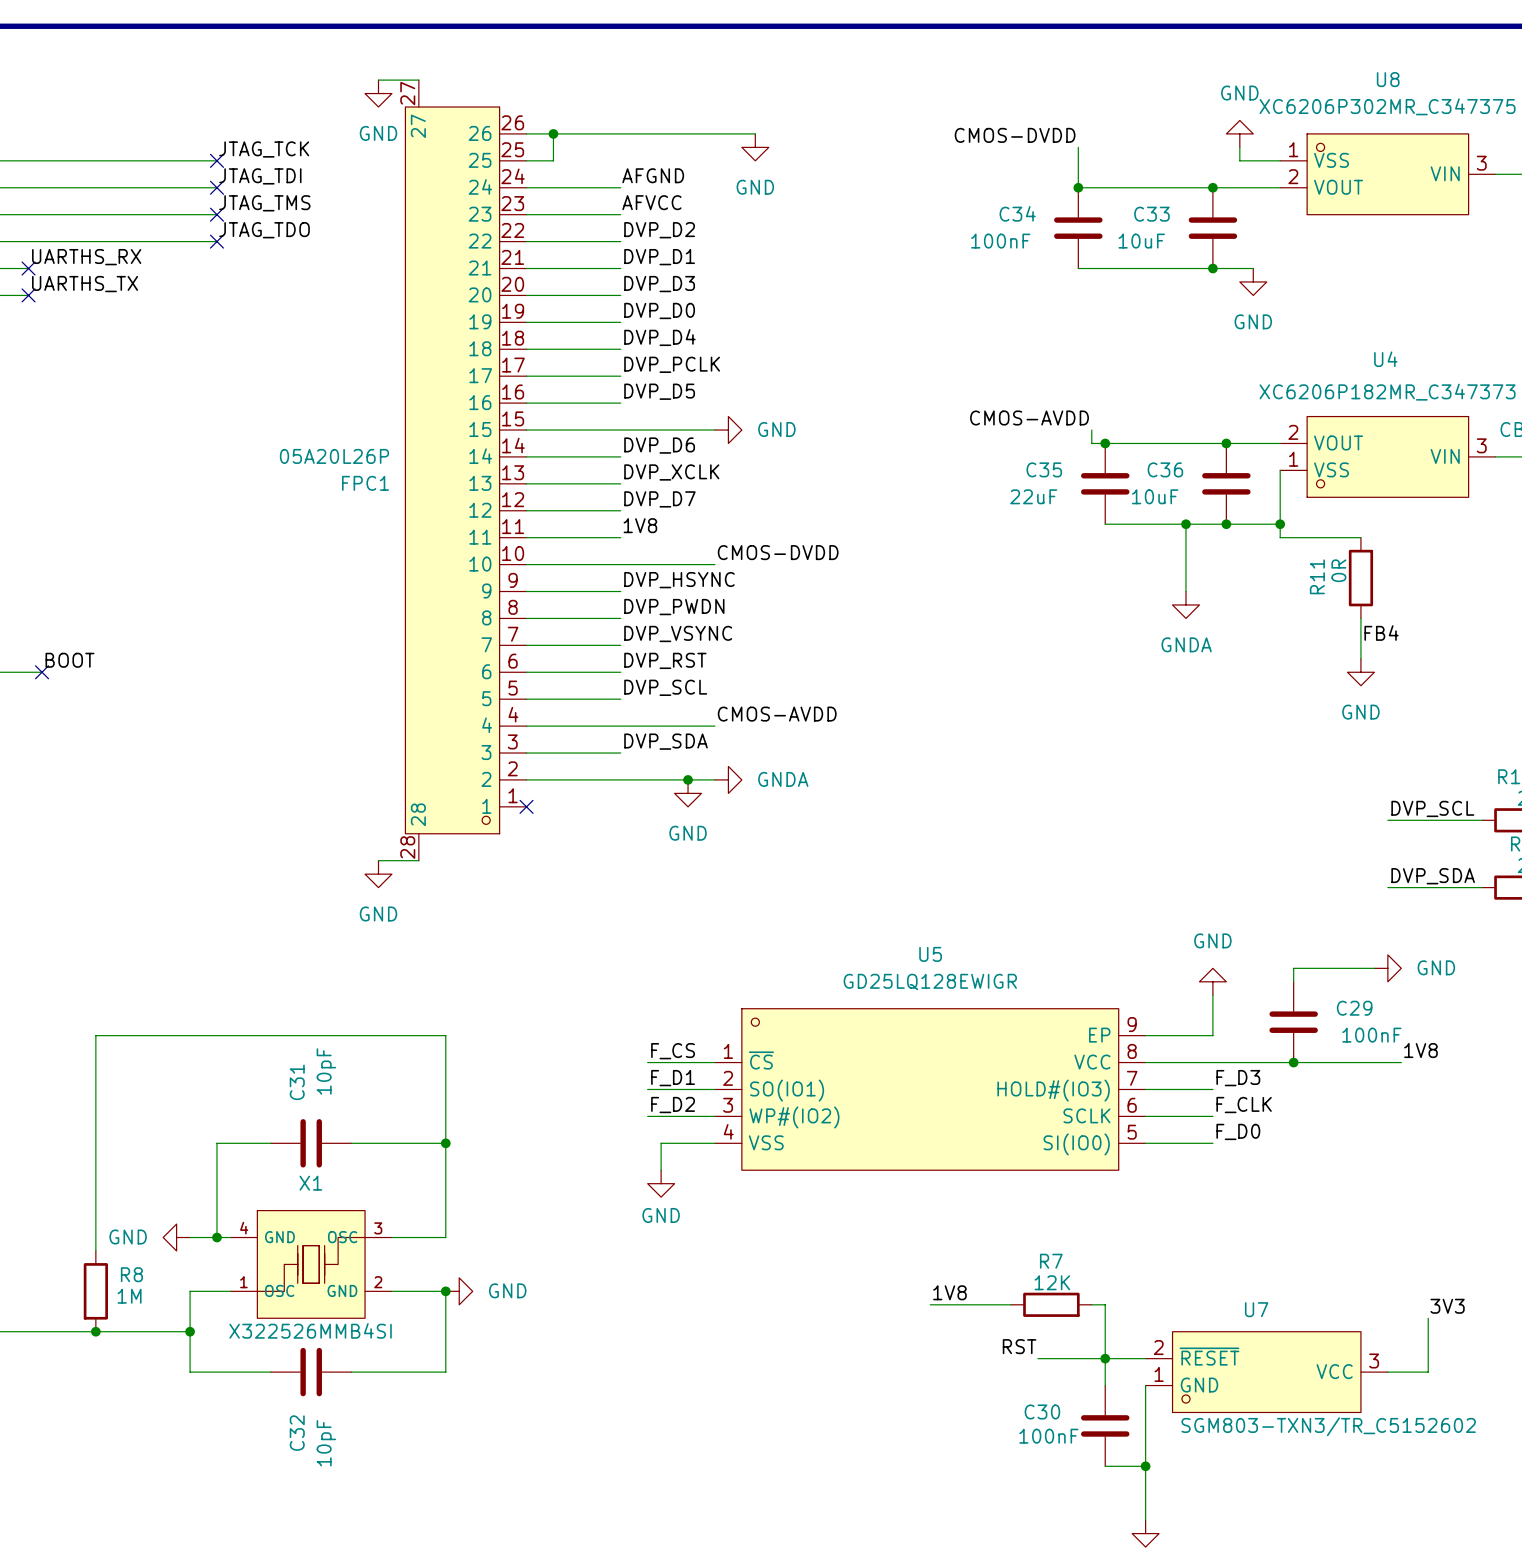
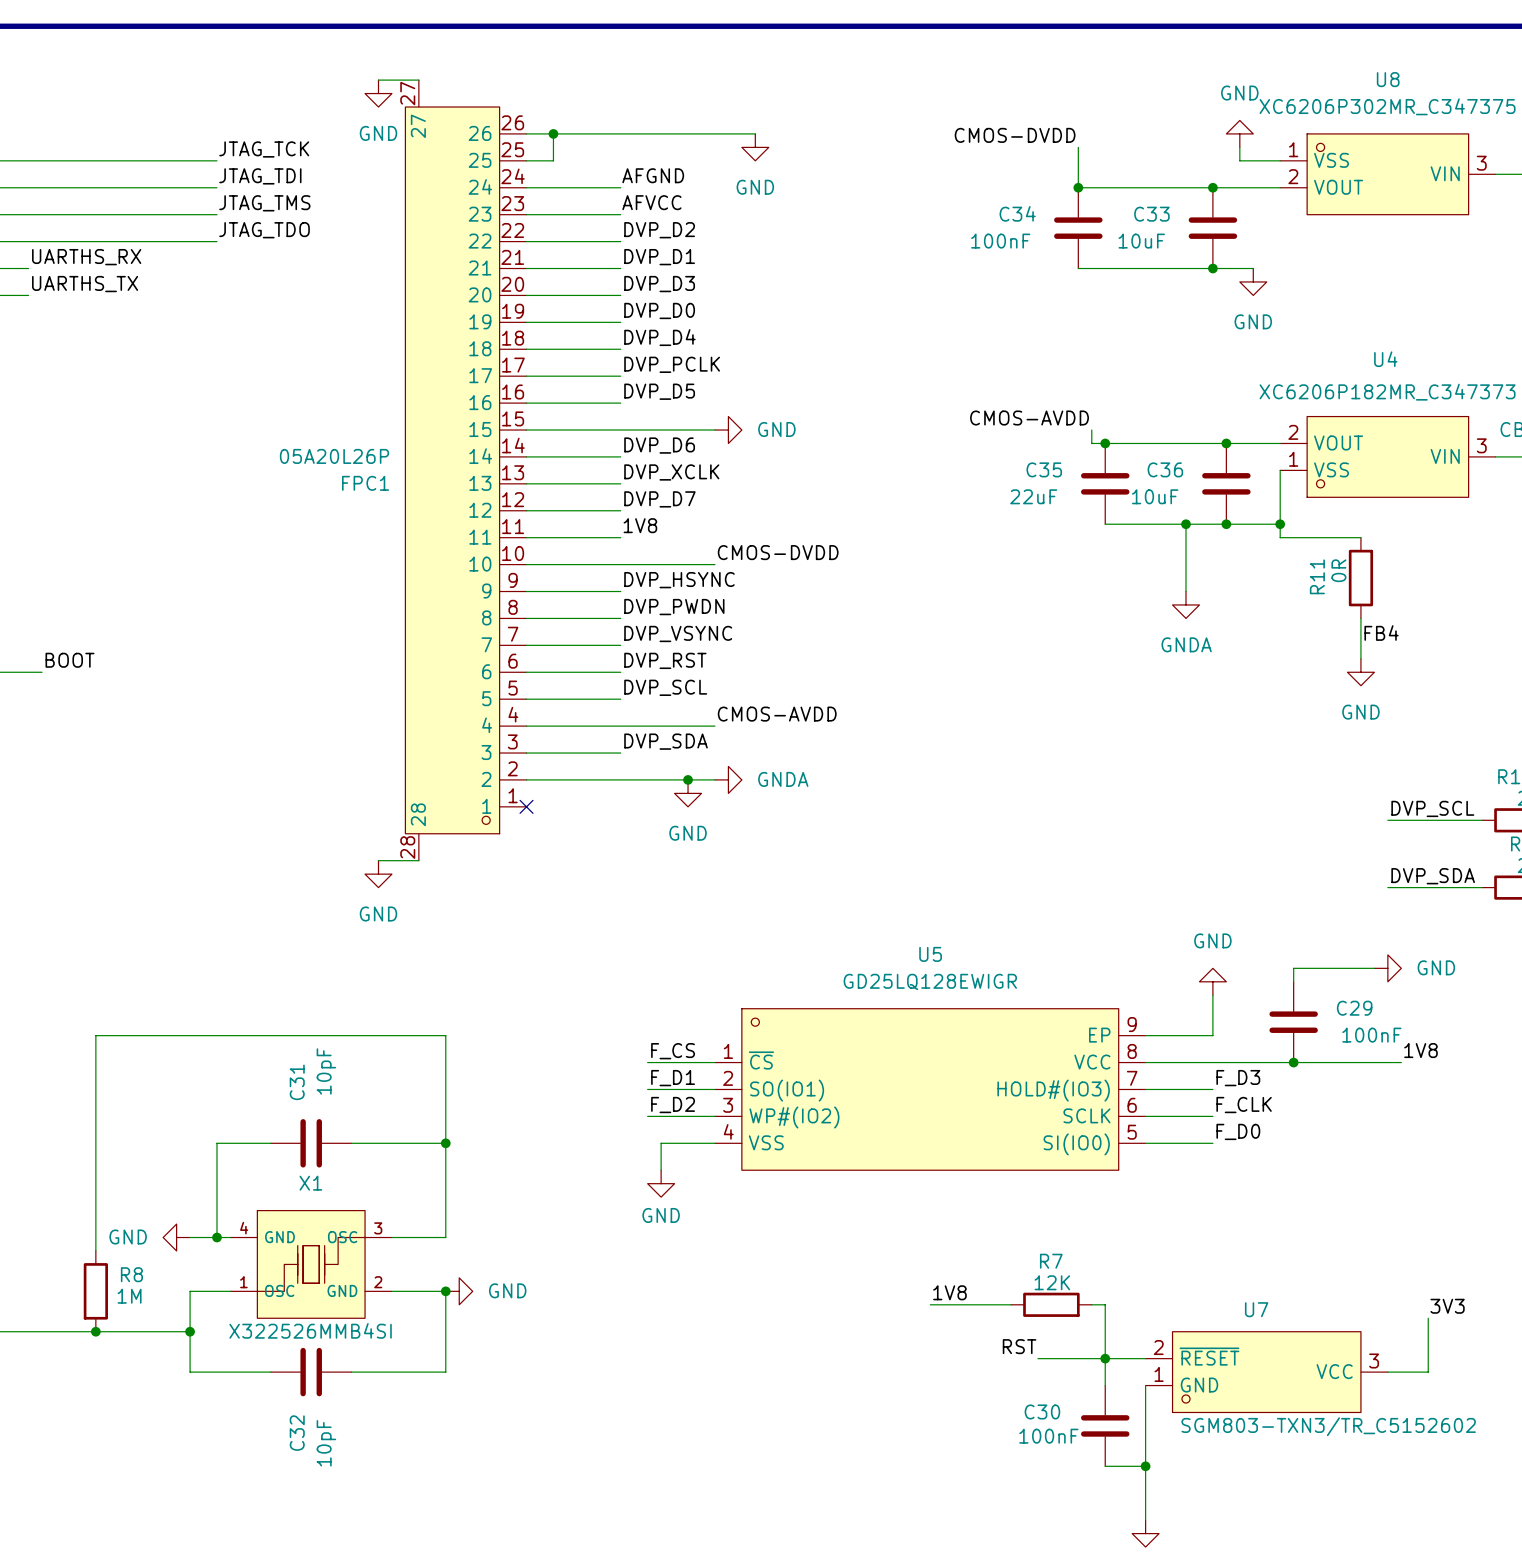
no-connect mark: (216, 160) -> none
no-connect mark: (216, 187) -> none
no-connect mark: (216, 214) -> none
no-connect mark: (216, 241) -> none
no-connect mark: (28, 268) -> none
no-connect mark: (28, 295) -> none
no-connect mark: (42, 672) -> none

